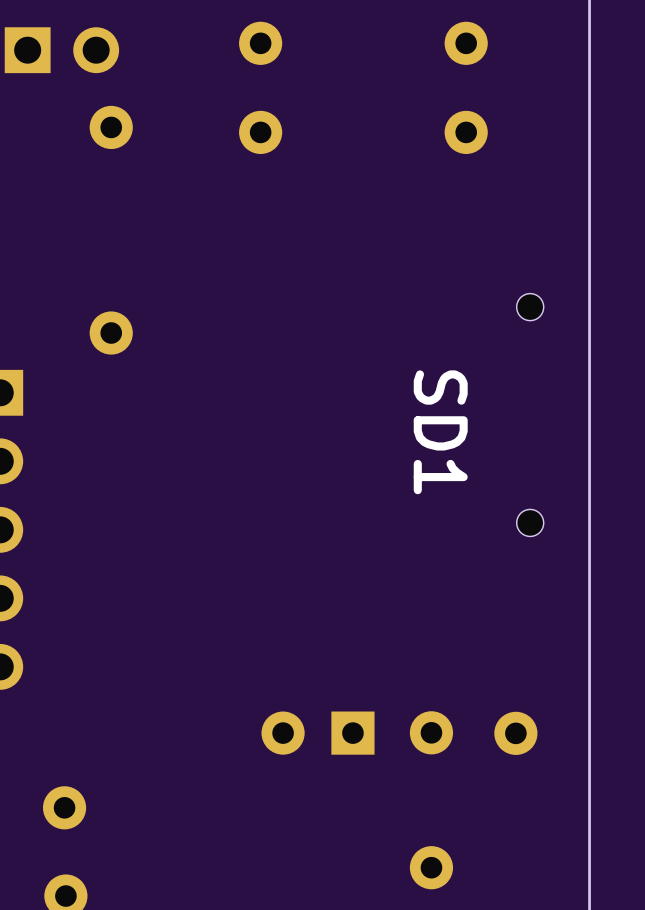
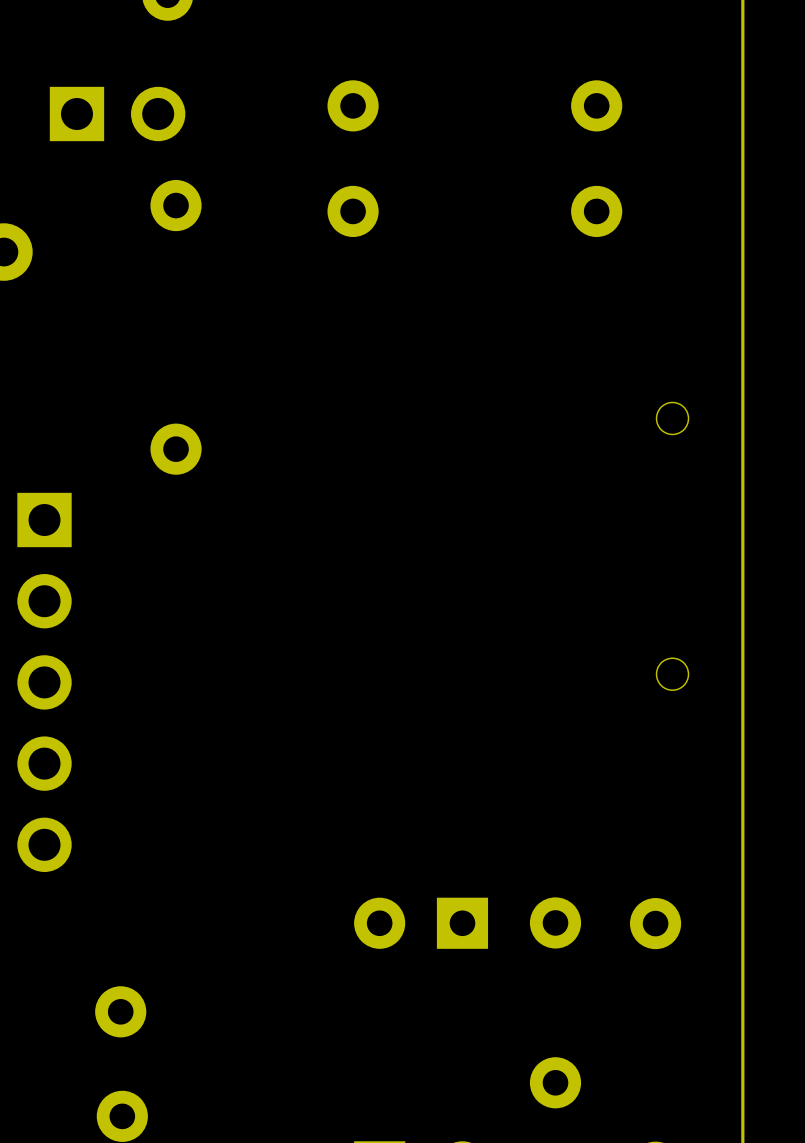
text: SD1 (440, 432) -> none

